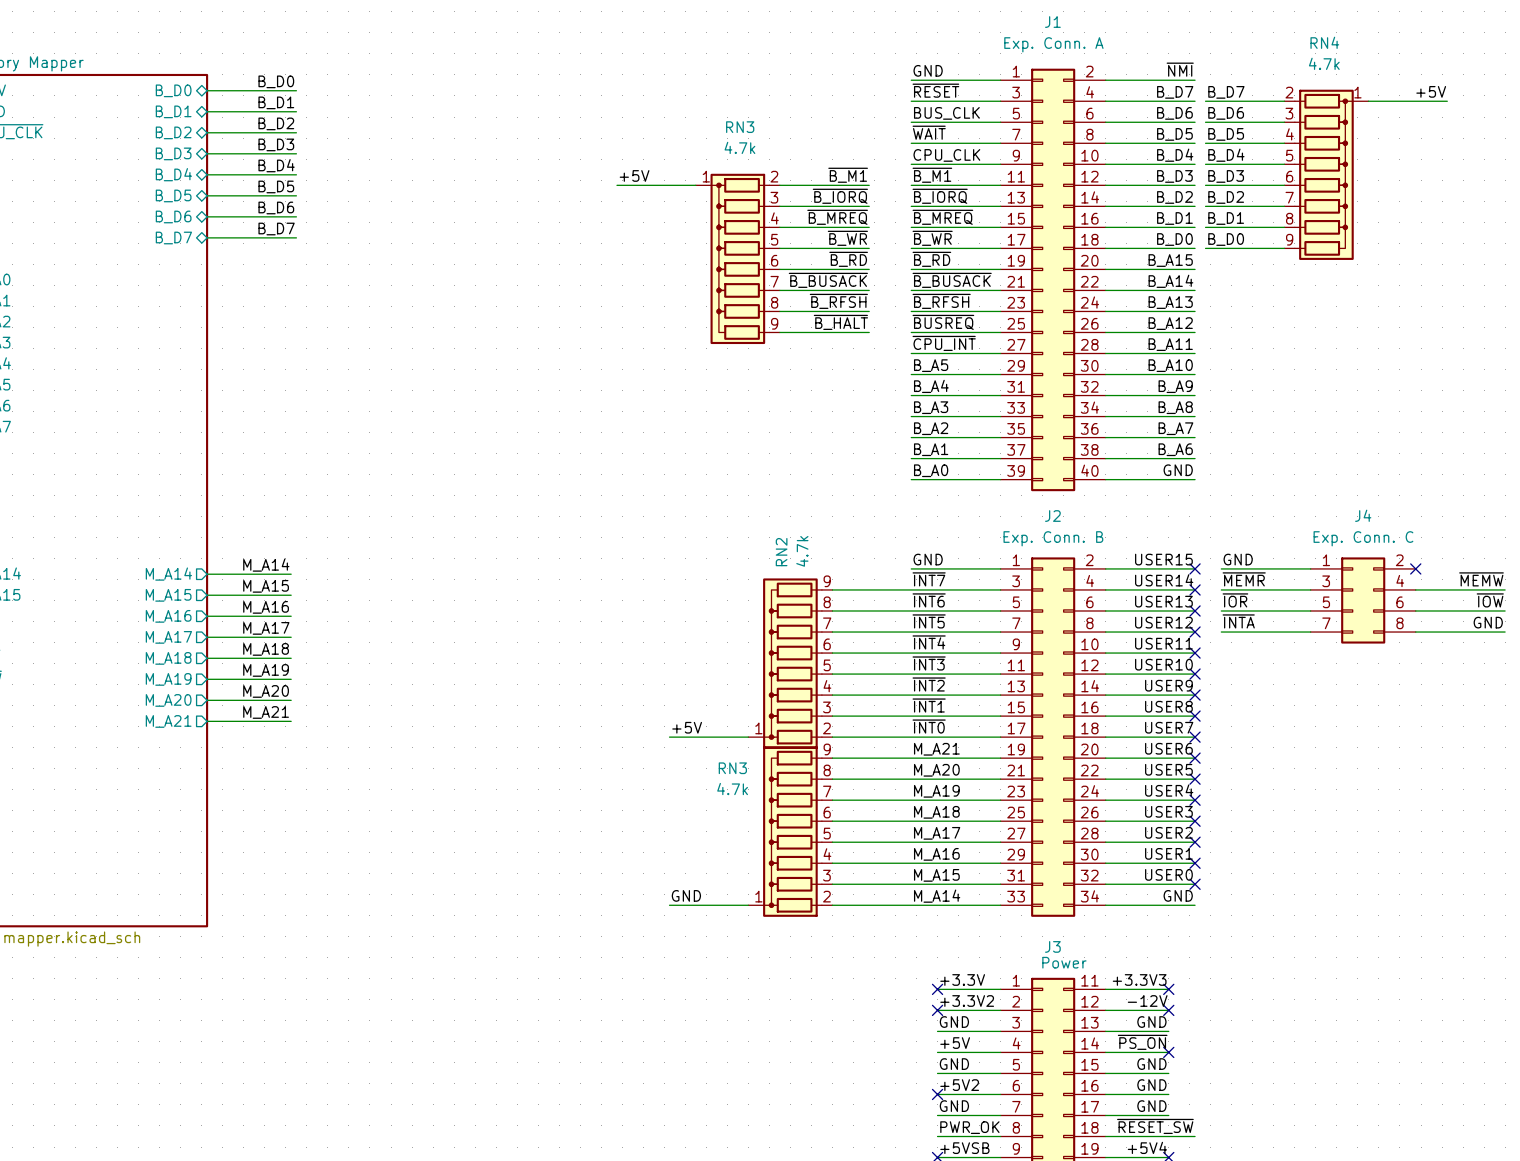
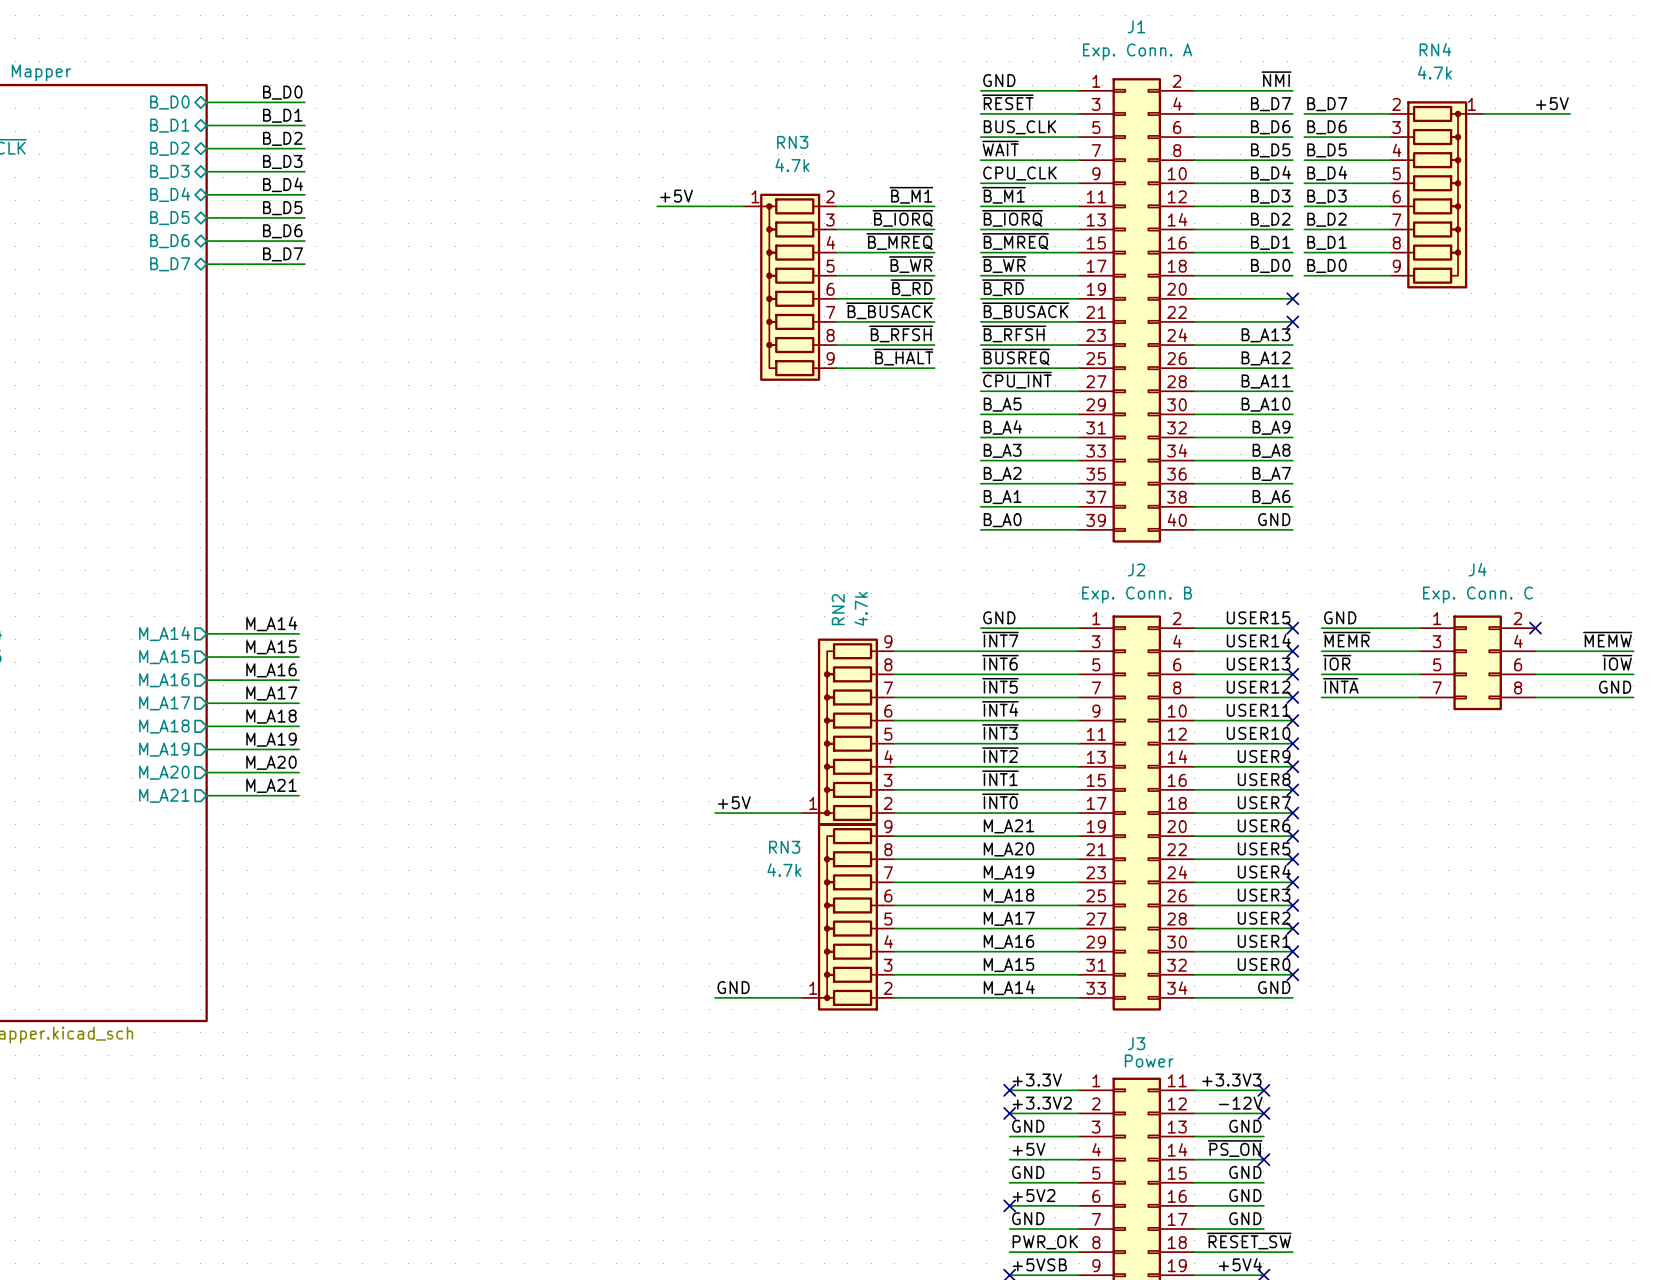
label: B_A15 (1170, 260) -> none
no-connect mark: none -> (1292, 298)
label: B_A14 (1170, 281) -> none
no-connect mark: none -> (1292, 321)

